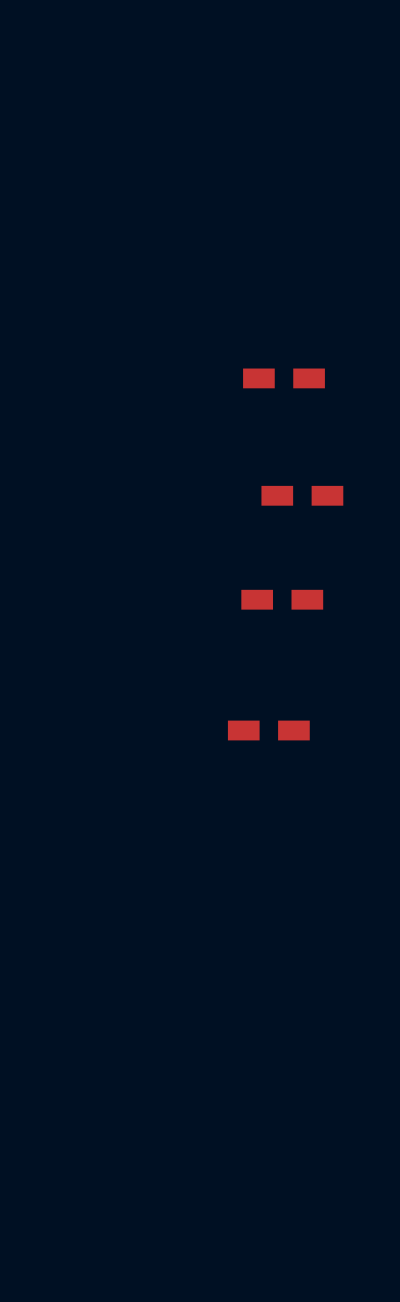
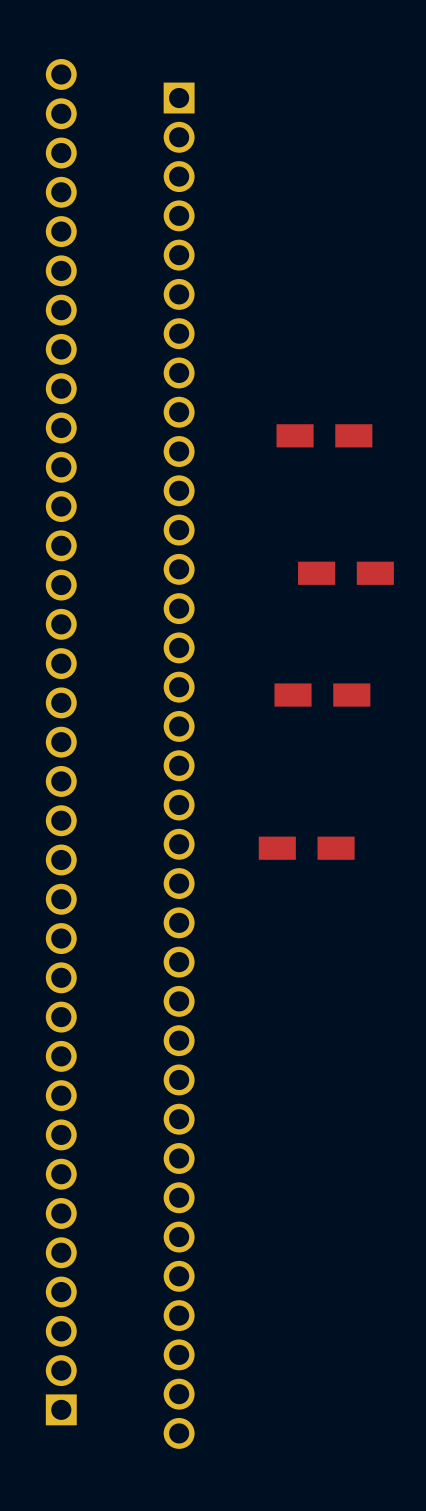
part: none -> (61, 742)
part: none -> (179, 765)

